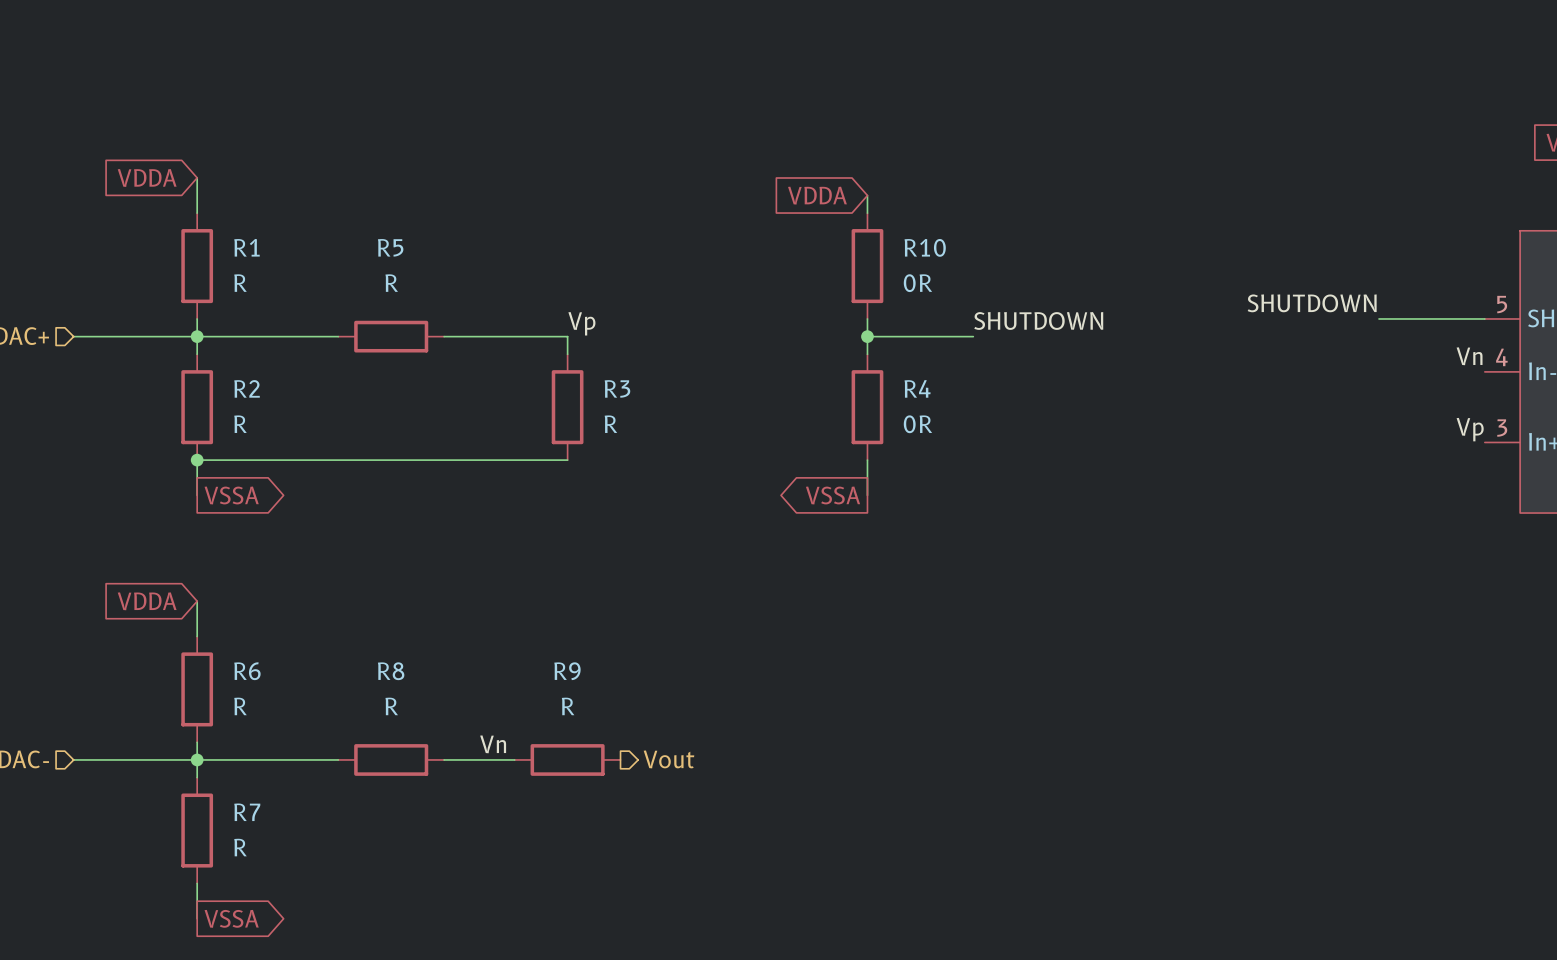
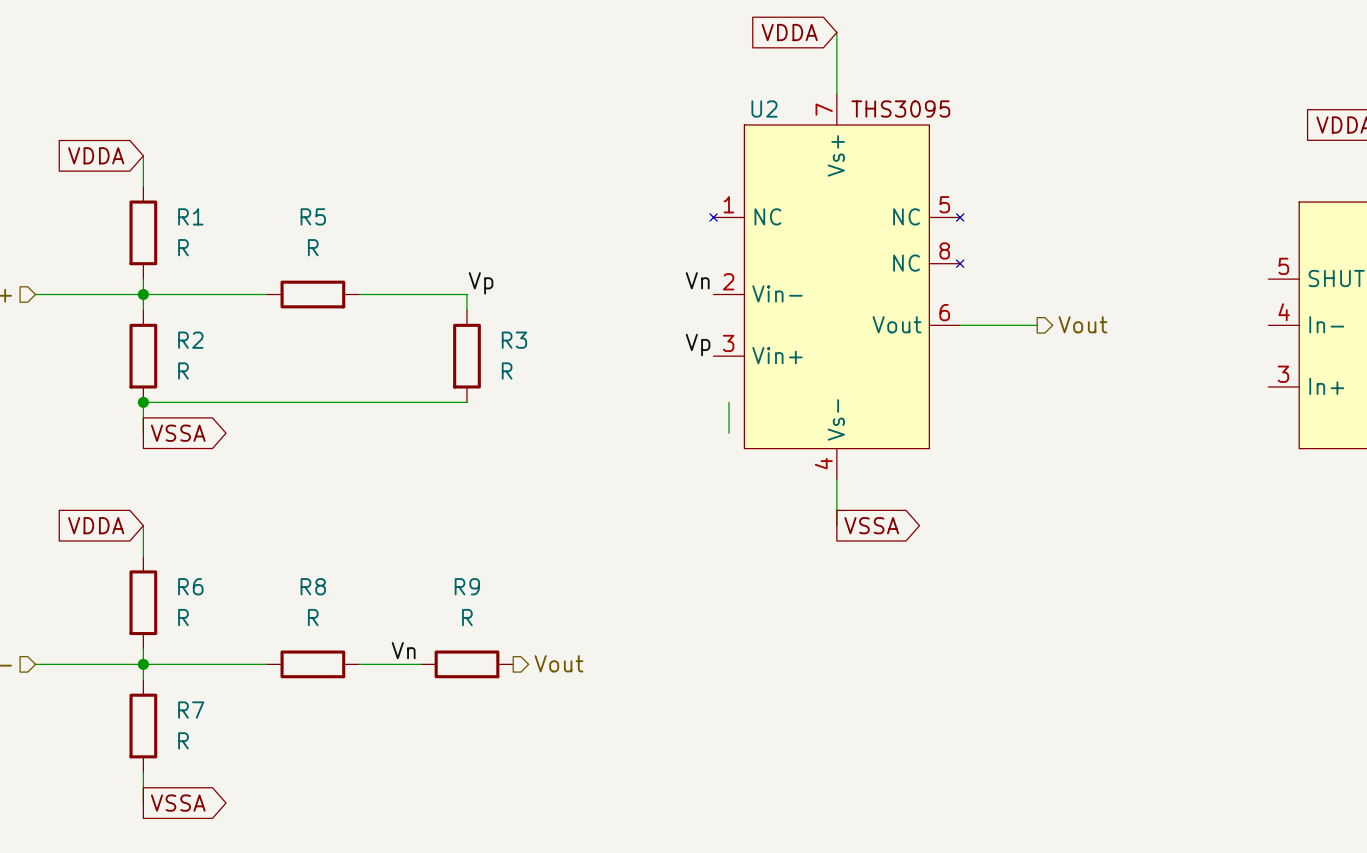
wire: none -> (836, 32) (836, 94)
global label position: VDDA (817, 195) -> VDDA (789, 32)
wire: (867, 195) (867, 213) -> none
R10: 0R (867, 266) -> none
label: SHUTDOWN (1312, 303) -> none
wire: (867, 318) (867, 354) -> none
wire: (1379, 318) (1484, 318) -> none
label: SHUTDOWN (1038, 320) -> none
label: none -> Vn (697, 280)
U2: none -> (836, 286)
junction: (867, 336) -> none
label: Vn (1469, 356) -> none
wire: none -> (960, 325) (1037, 325)
hierarchical label: none -> Vout (1082, 324)
label: none -> Vp (698, 344)
R4: 0R (867, 407) -> none
label: Vp (1470, 429) -> none
global label rotation: 0° (833, 495) -> 180° (871, 525)
global label position: VSSA (833, 495) -> VSSA (871, 525)
wire: none -> (836, 479) (836, 525)

